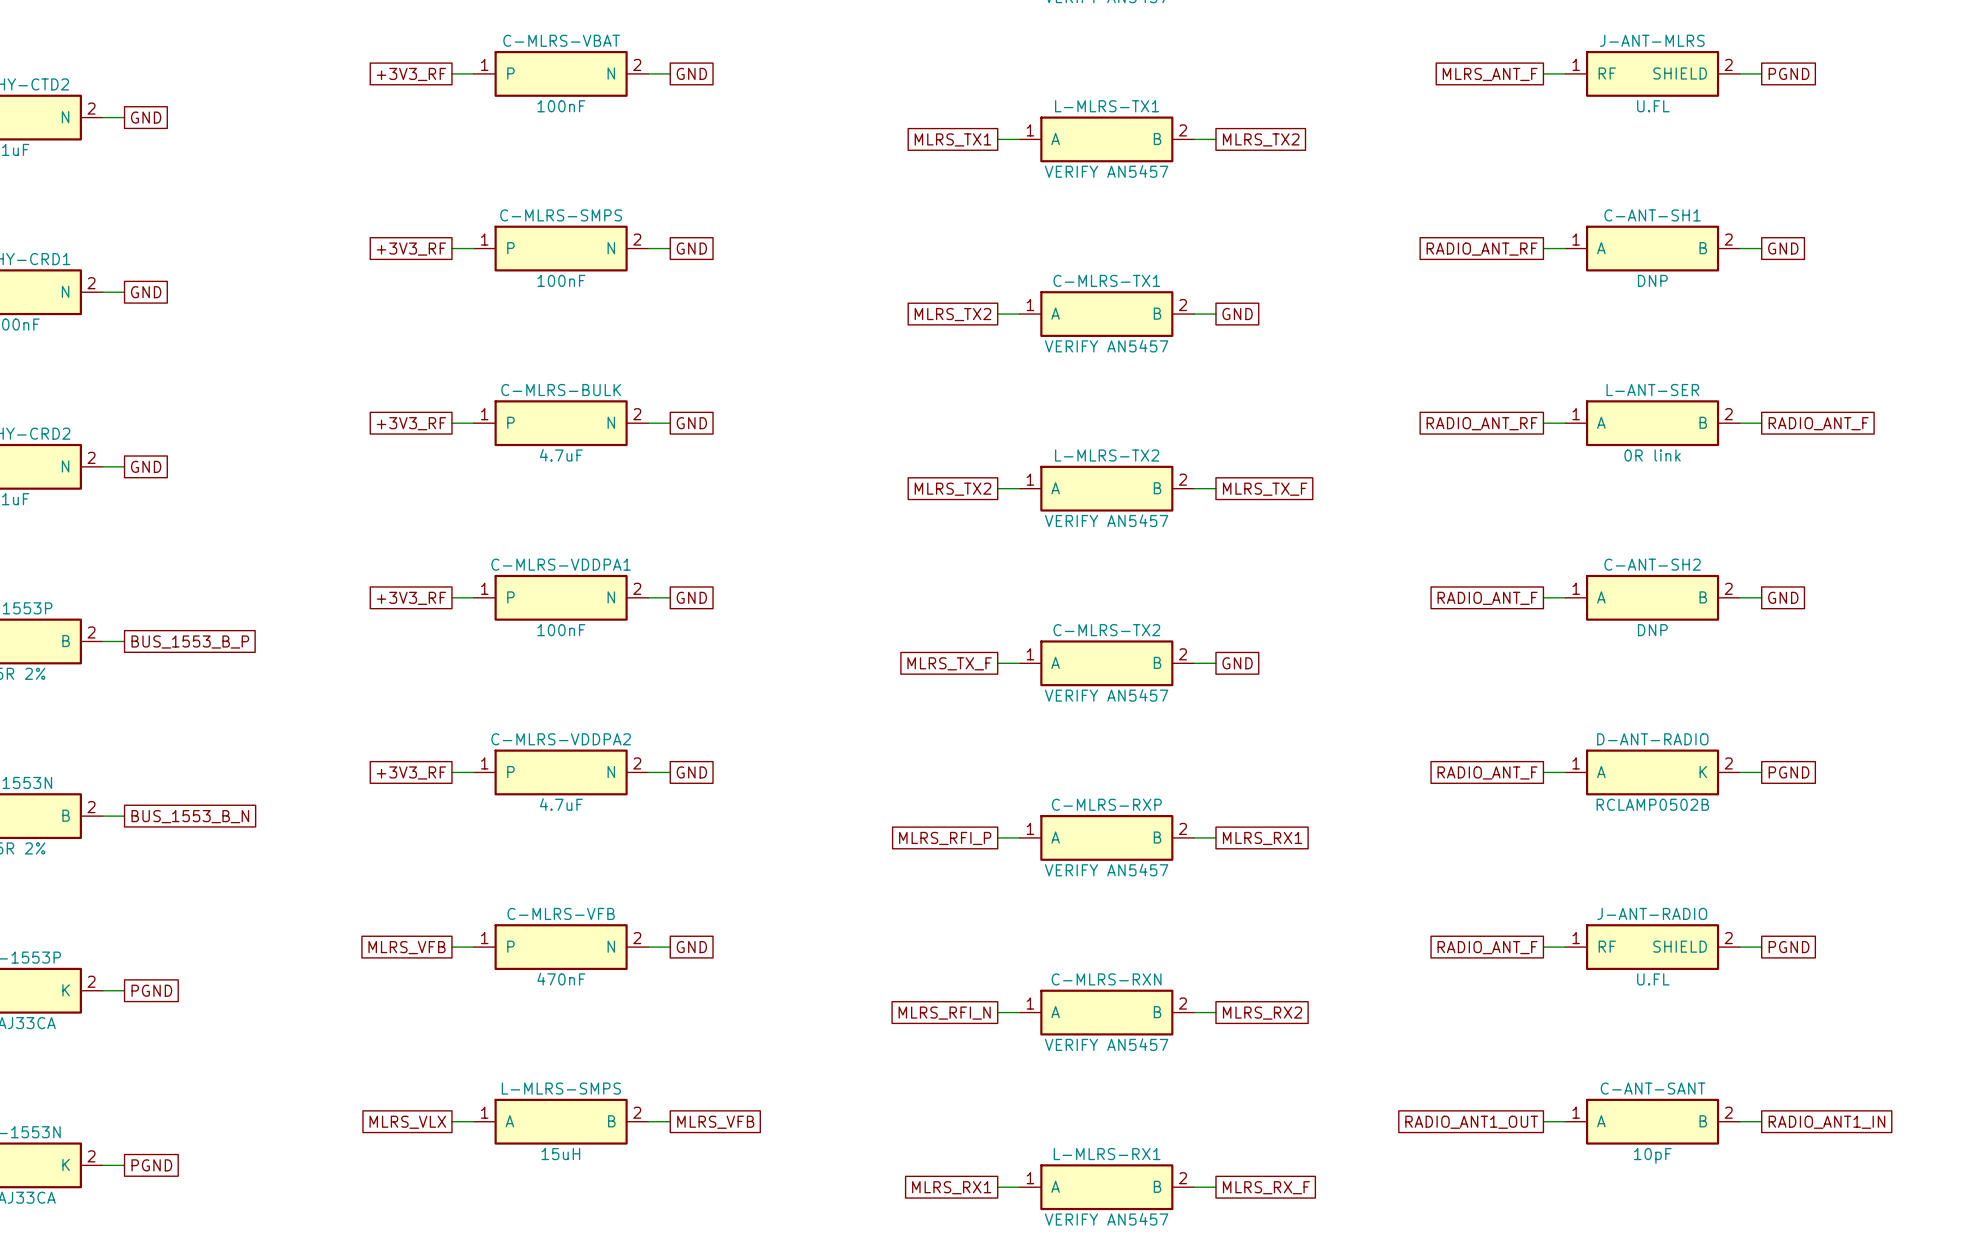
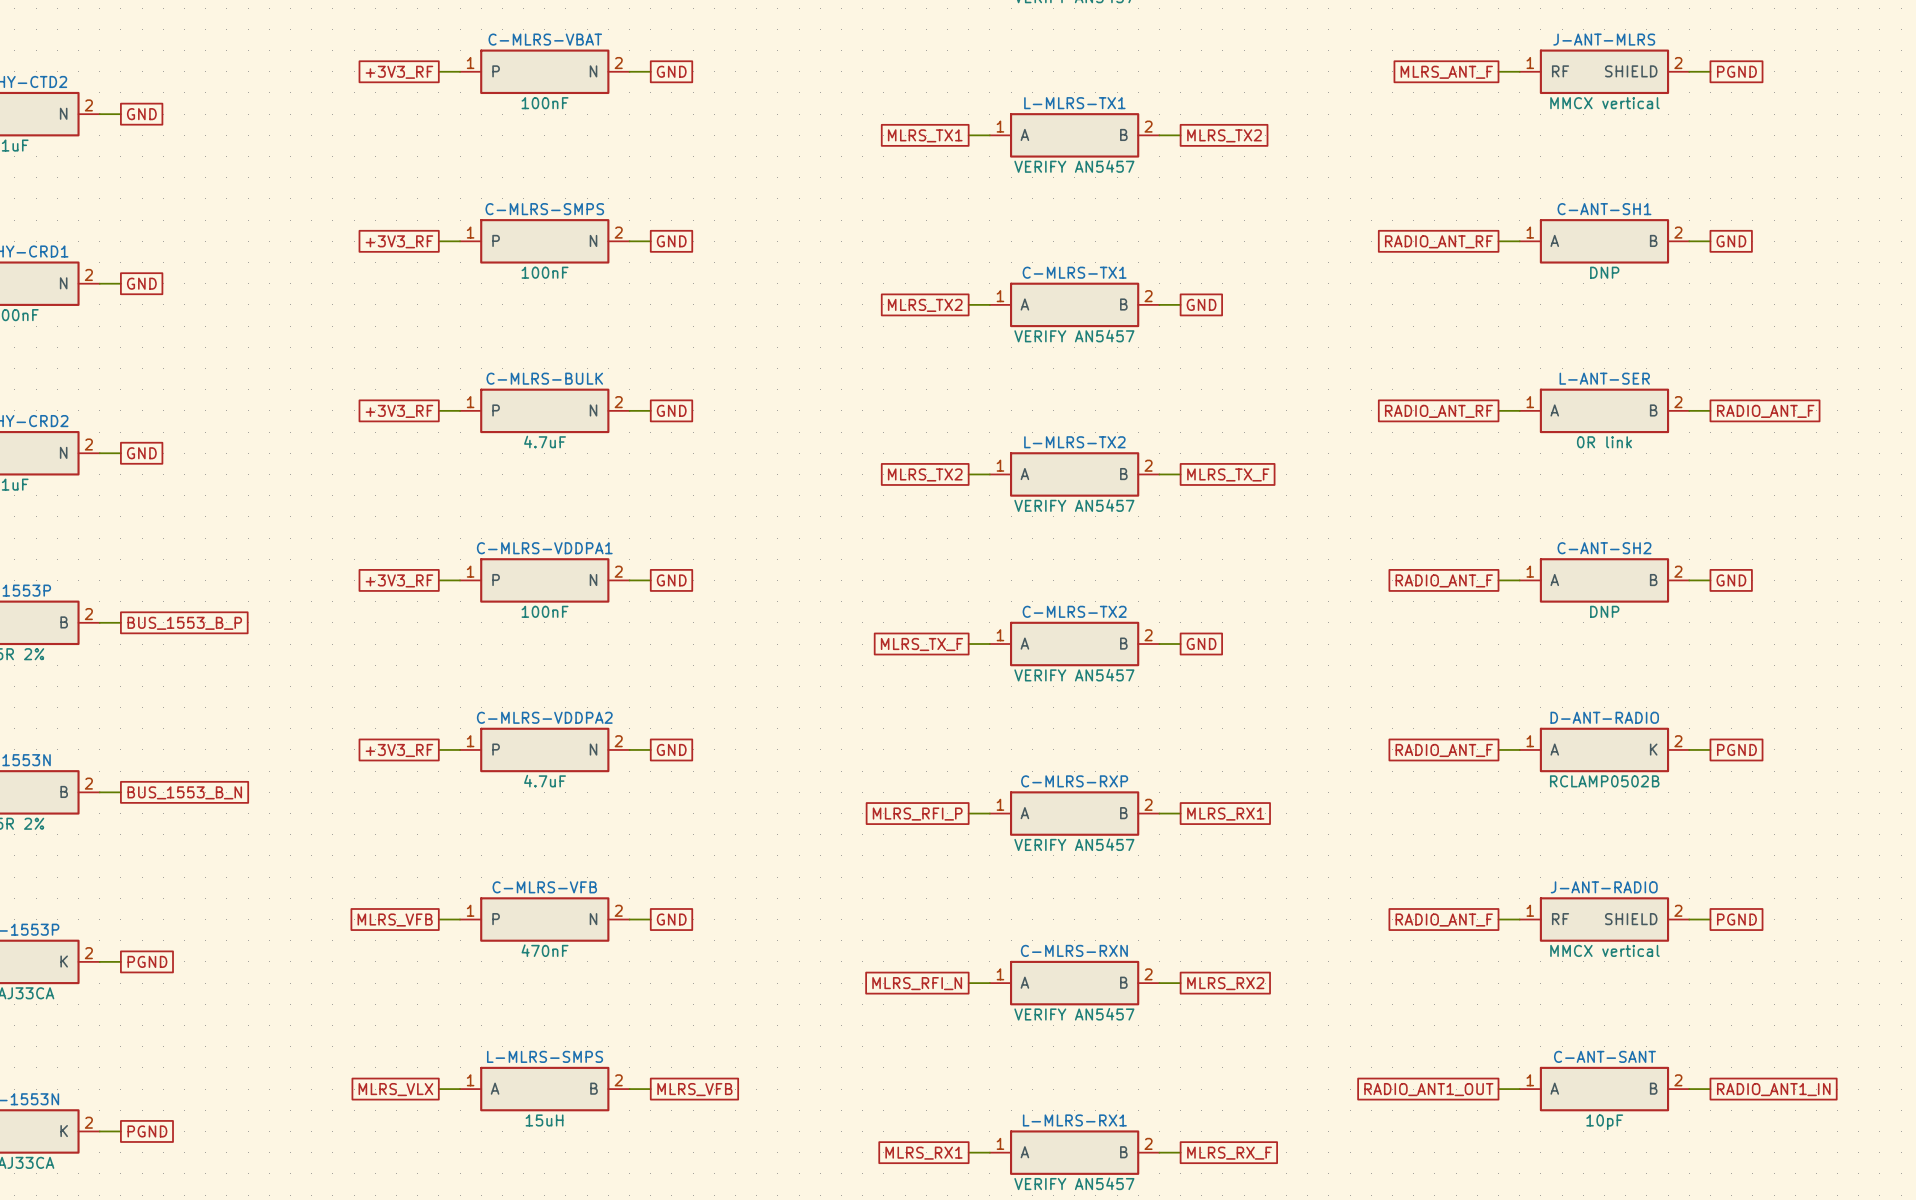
J-ANT-MLRS value: U.FL (1653, 106) -> MMCX vertical (1604, 103)
J-ANT-RADIO value: U.FL (1653, 979) -> MMCX vertical (1604, 950)

